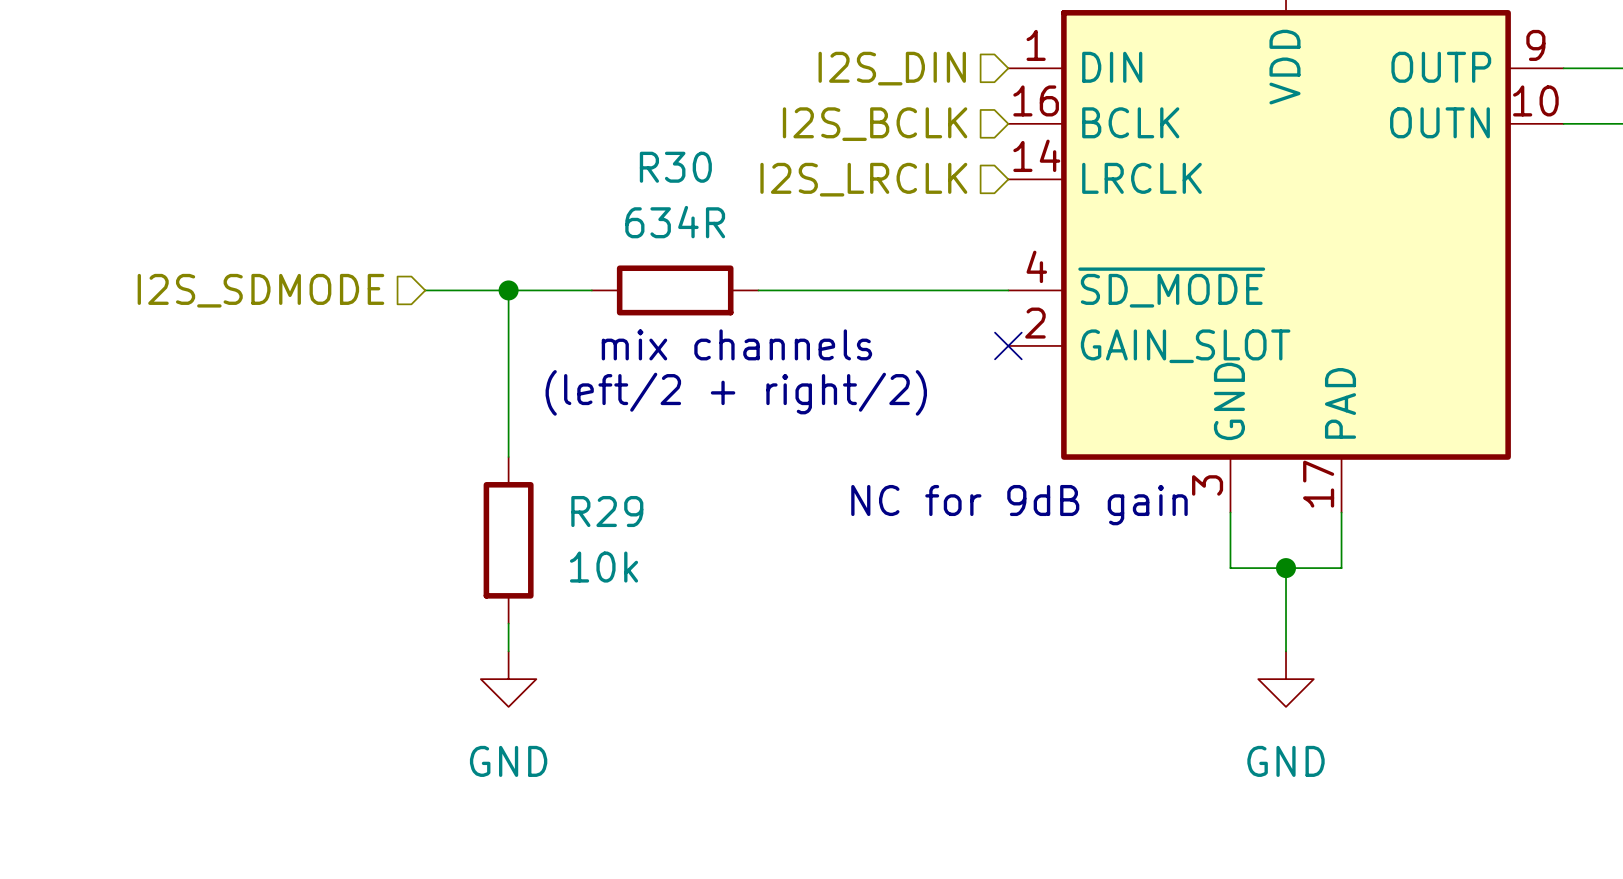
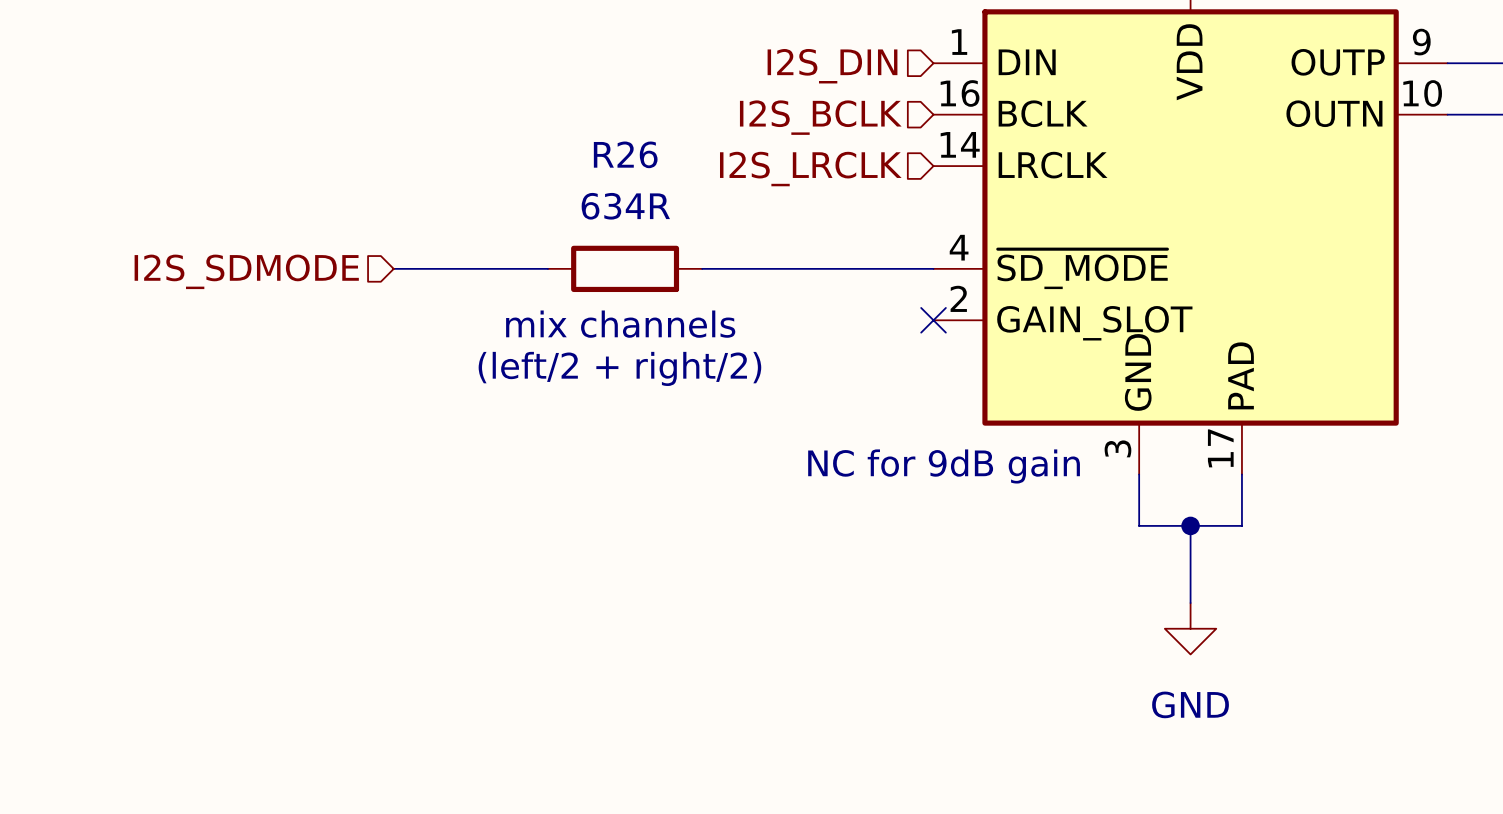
R30 name: R30 (675, 167) -> R26 (625, 154)
wire: (508, 290) (508, 457) -> none
junction: (508, 290) -> none
text position: mix channels (736, 344) -> mix channels (620, 324)
text position: (left/2 + right/2) (736, 392) -> (left/2 + right/2) (619, 368)
R29: 10k (508, 540) -> none
wire: (508, 623) (508, 651) -> none
power symbol: GND (508, 679) -> none

